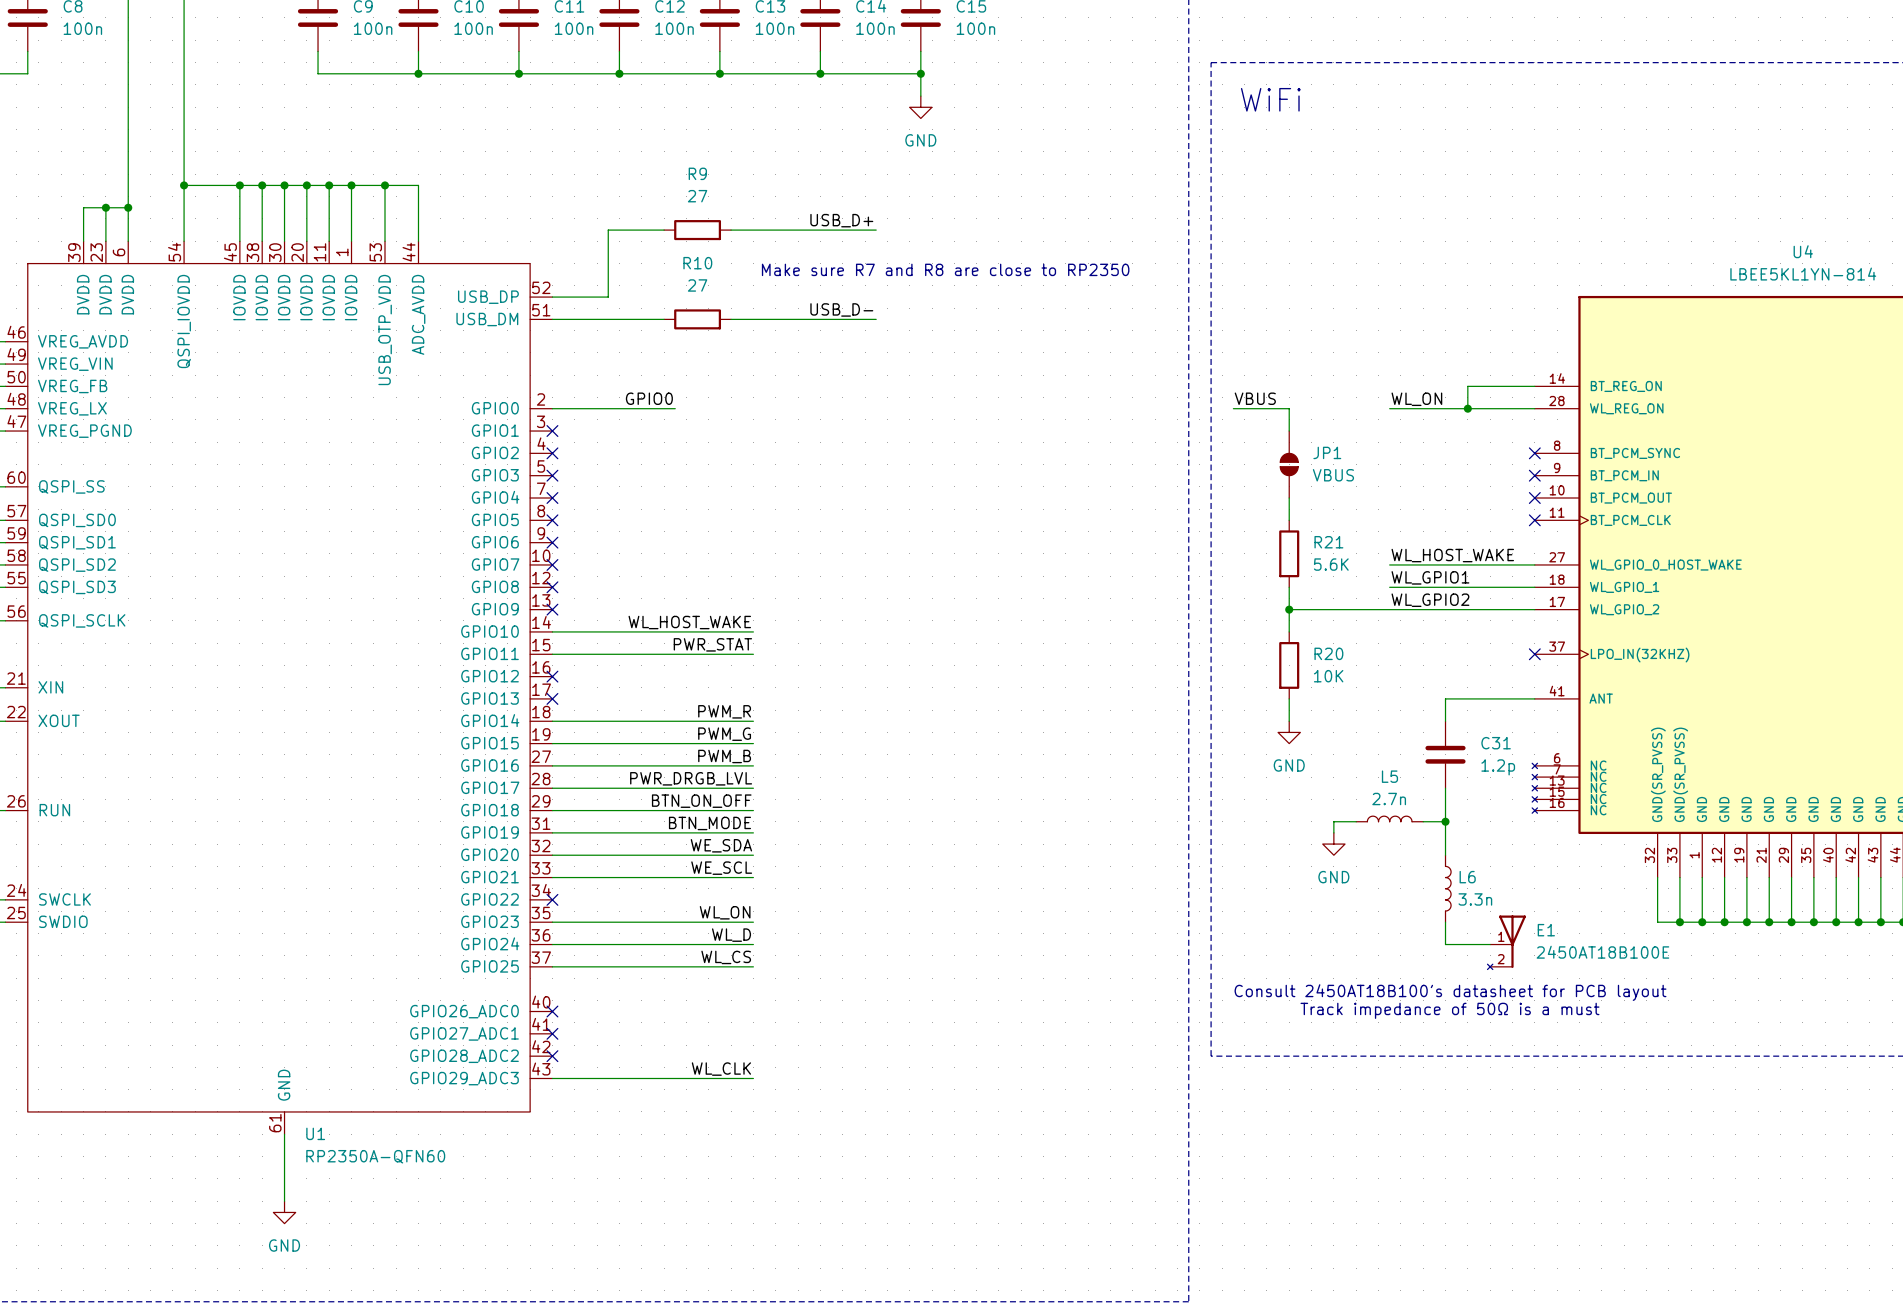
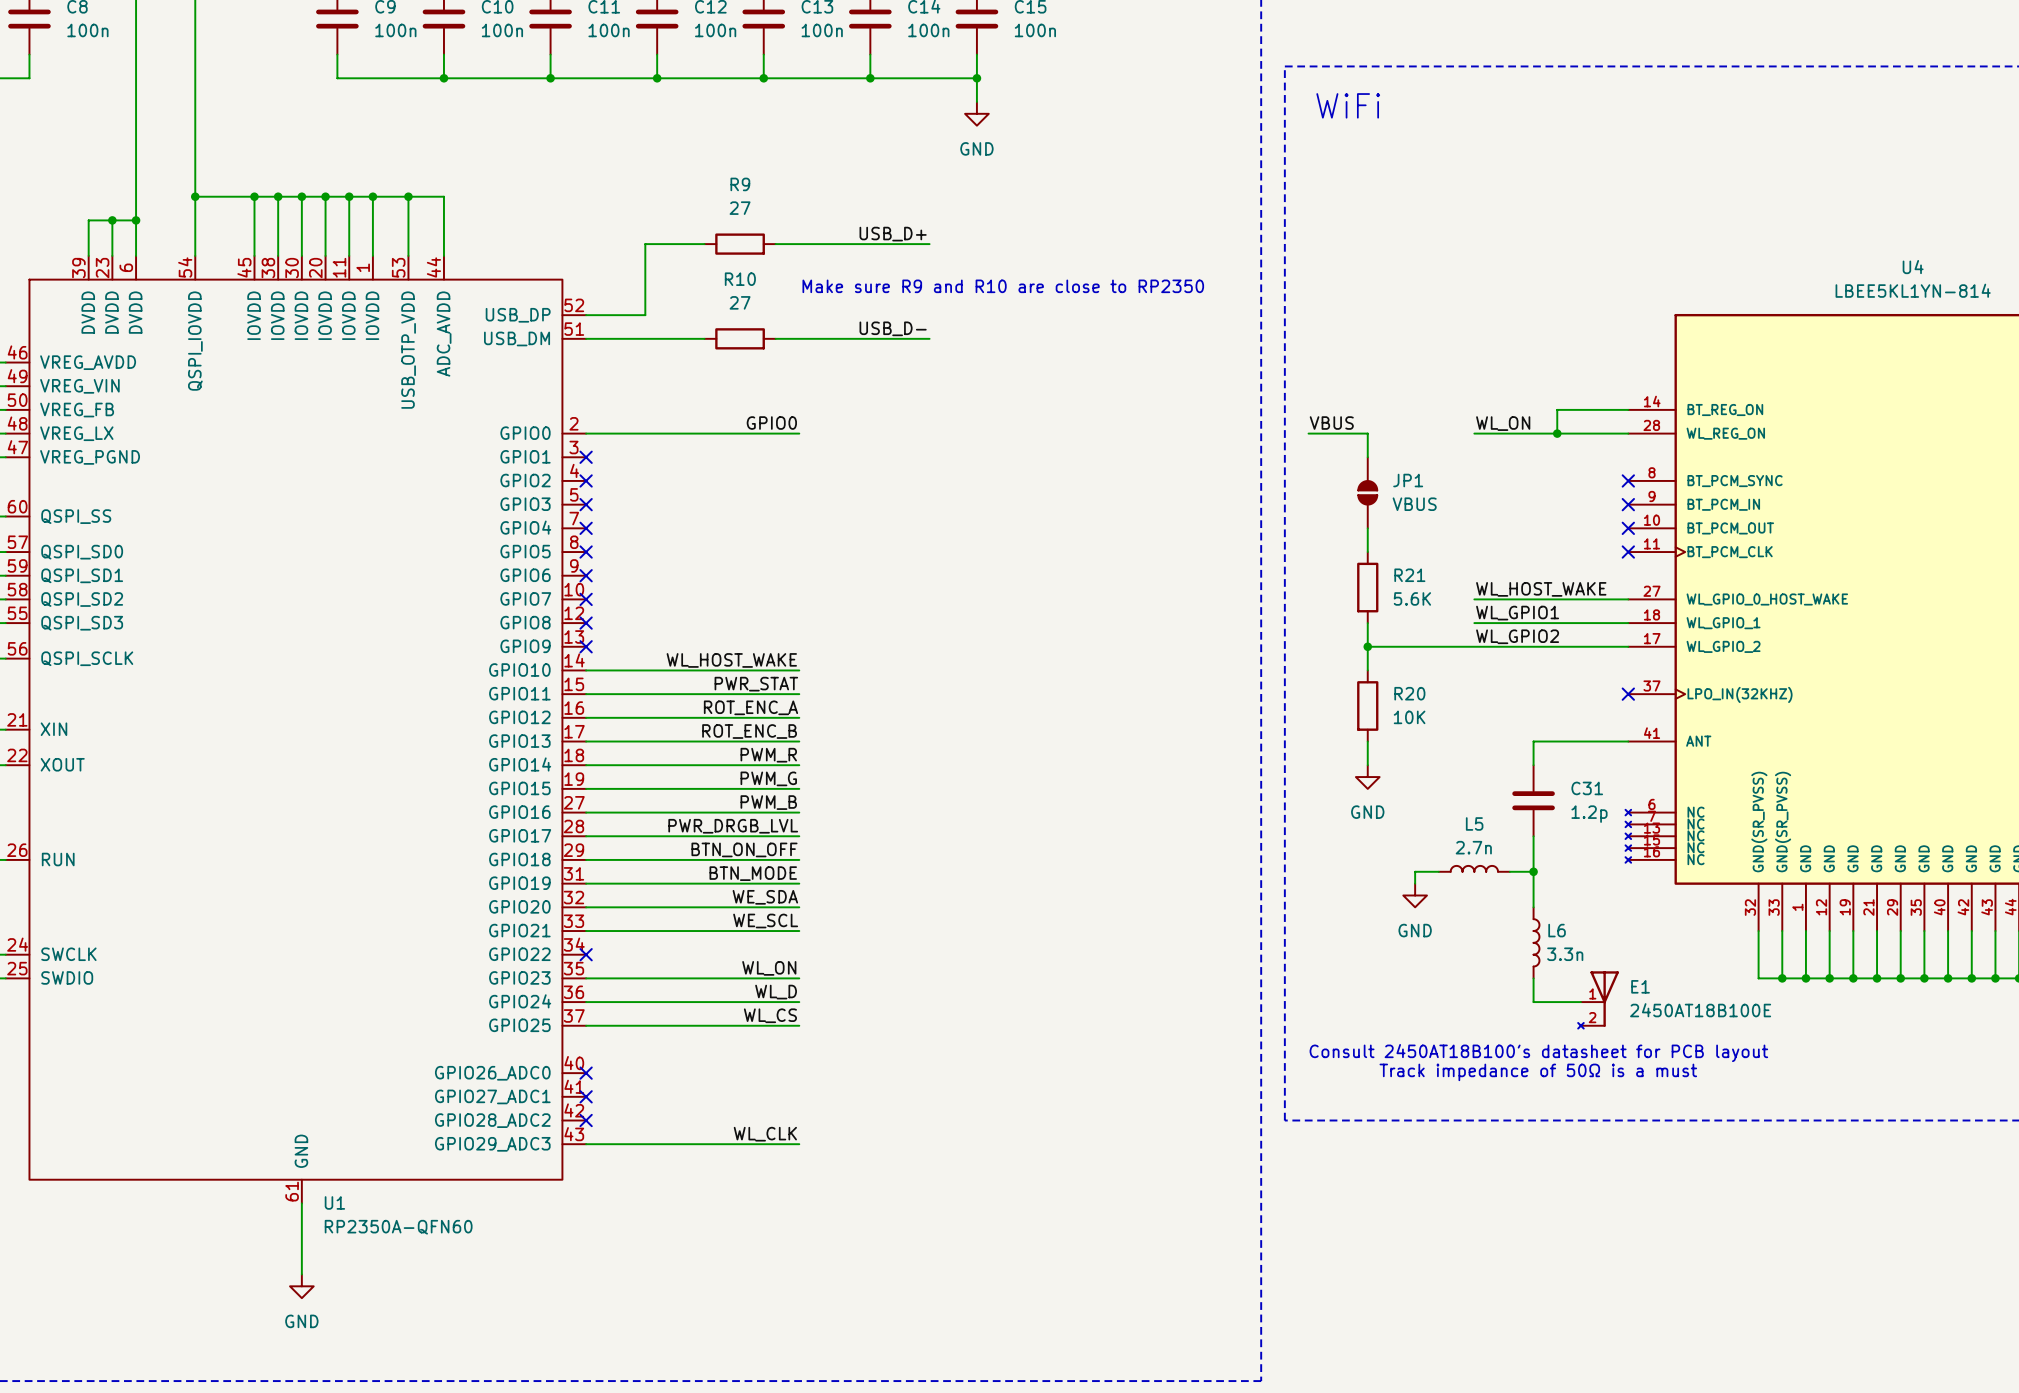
text: Make sure R7 and R8 are close to RP2350 (945, 269) -> Make sure R9 and R10 are close to RP2350 (1003, 286)
label position: GPIO0 (649, 398) -> GPIO0 (771, 423)
wire: none -> (716, 433) (799, 433)
label: none -> ROT_ENC_A (750, 707)
wire: none -> (586, 717) (799, 717)
no-connect mark: (552, 676) -> none
label: none -> ROT_ENC_B (749, 731)
wire: none -> (586, 741) (799, 741)
no-connect mark: (552, 698) -> none

